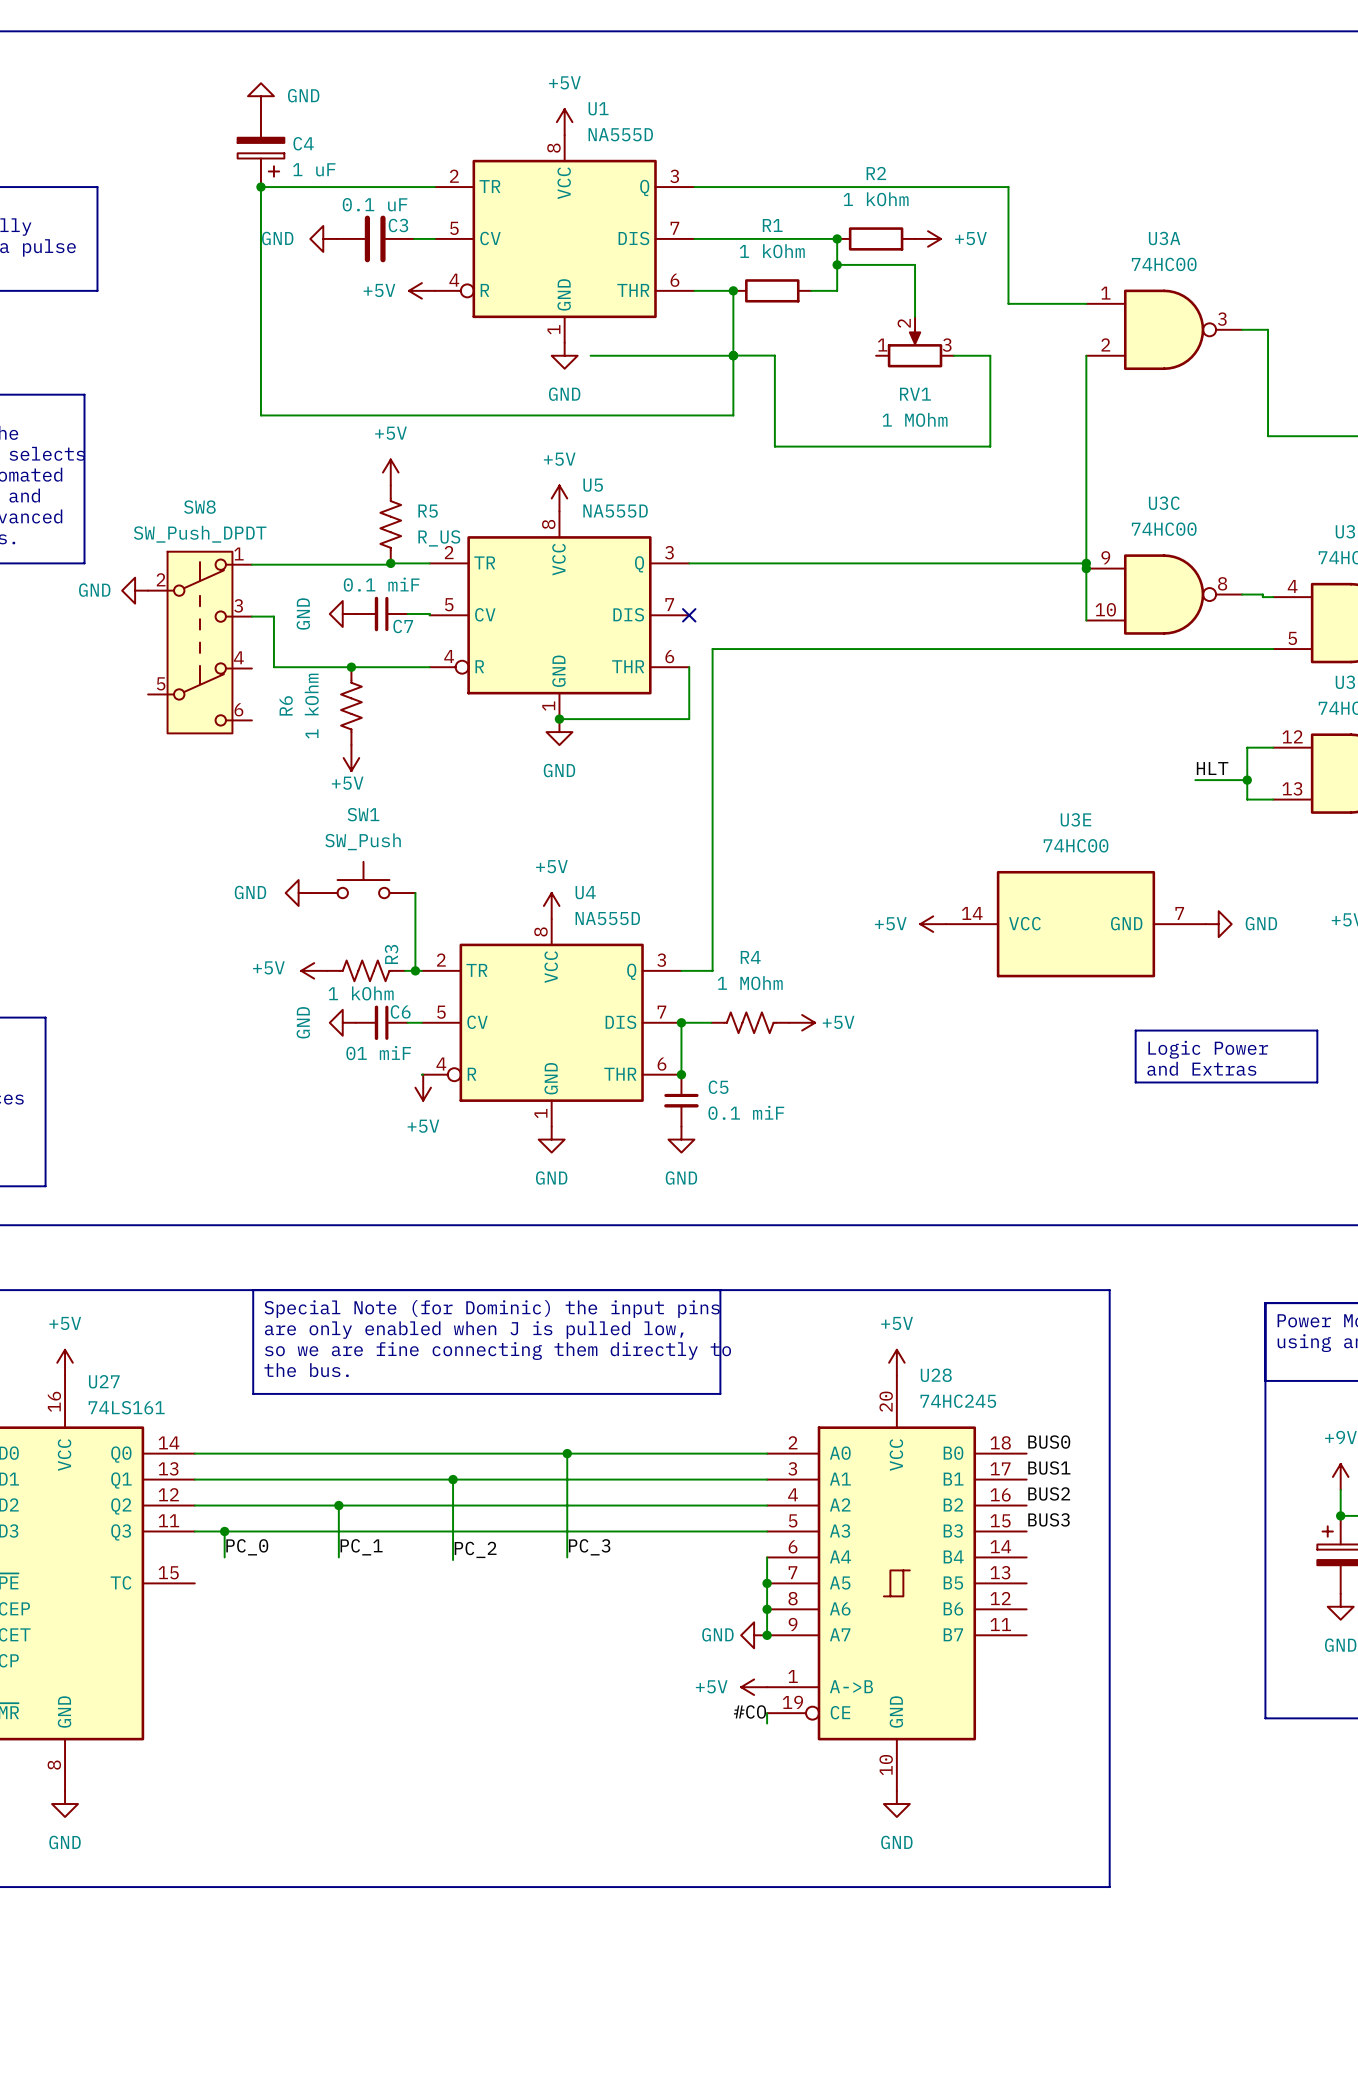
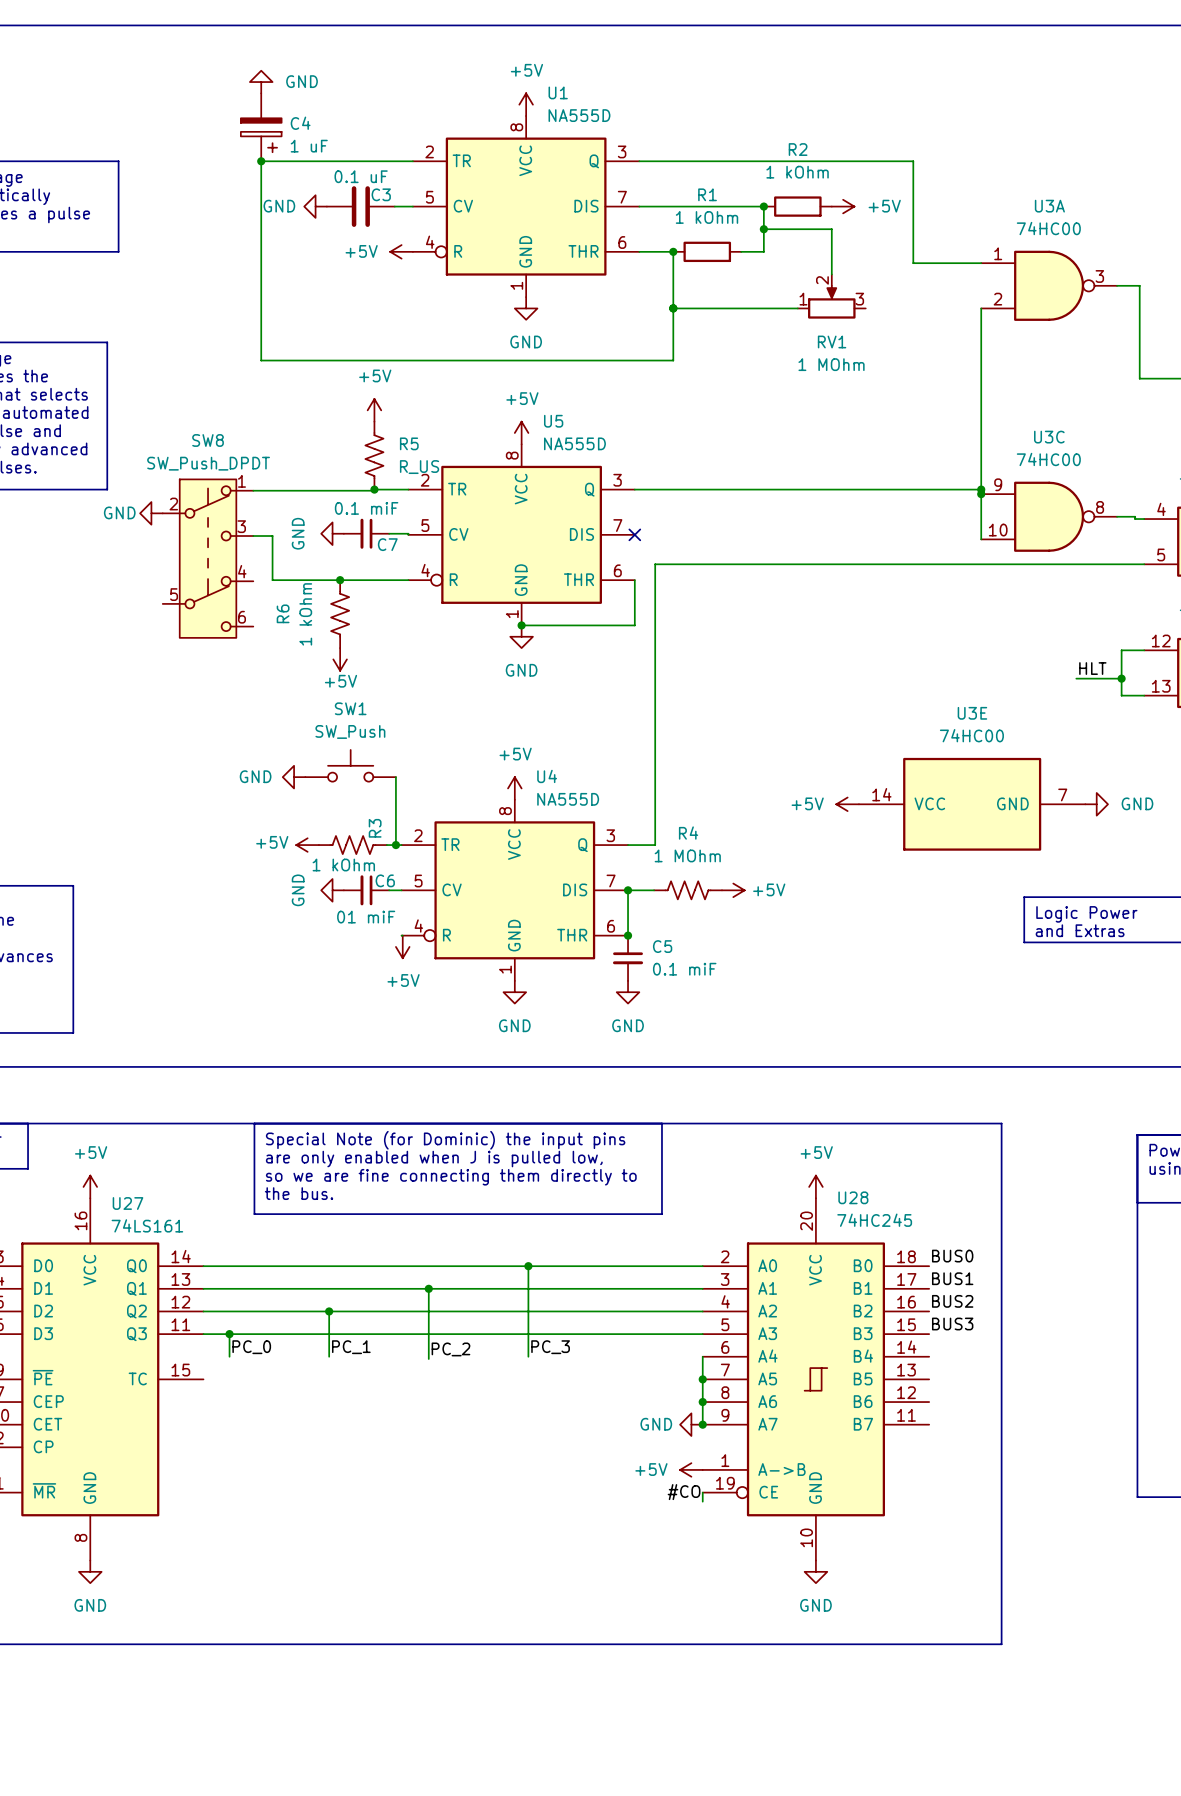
wire: (590, 355) (733, 355) -> none
wire: (733, 355) (774, 355) (774, 446) (990, 446) (990, 355) (953, 355) -> (673, 308) (797, 308)

